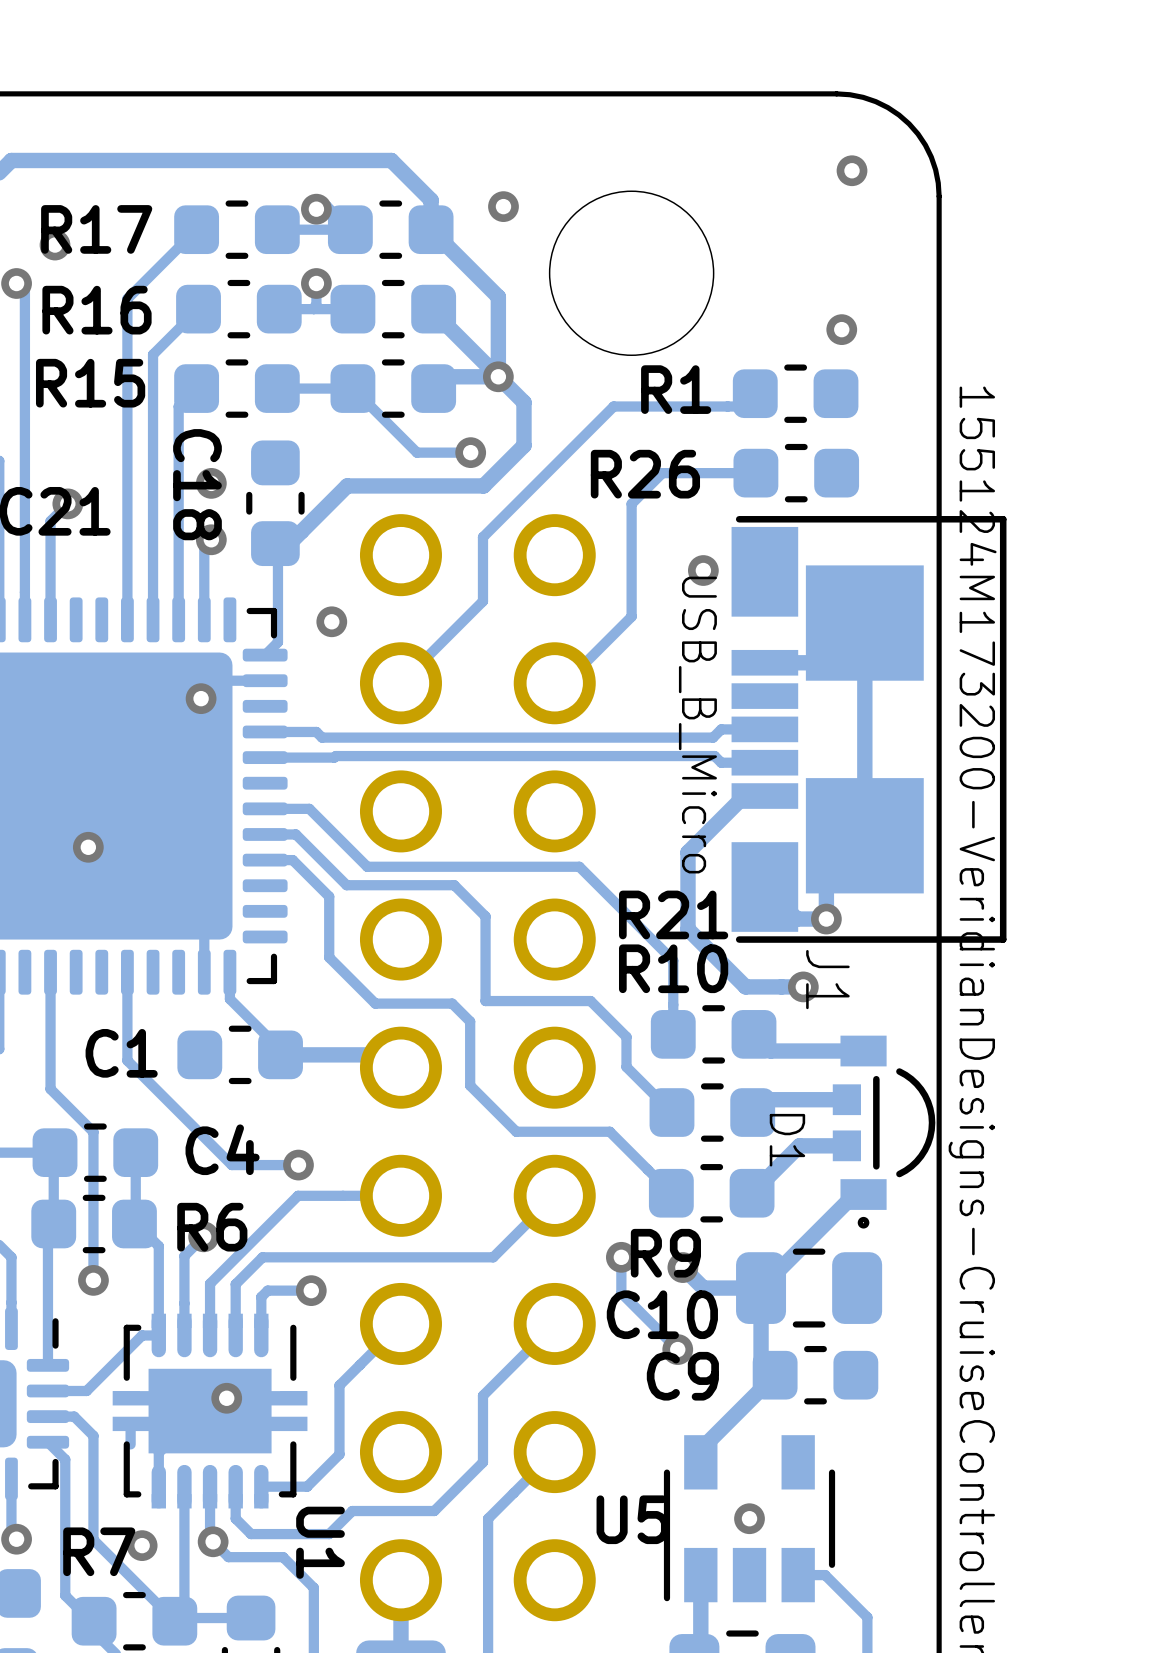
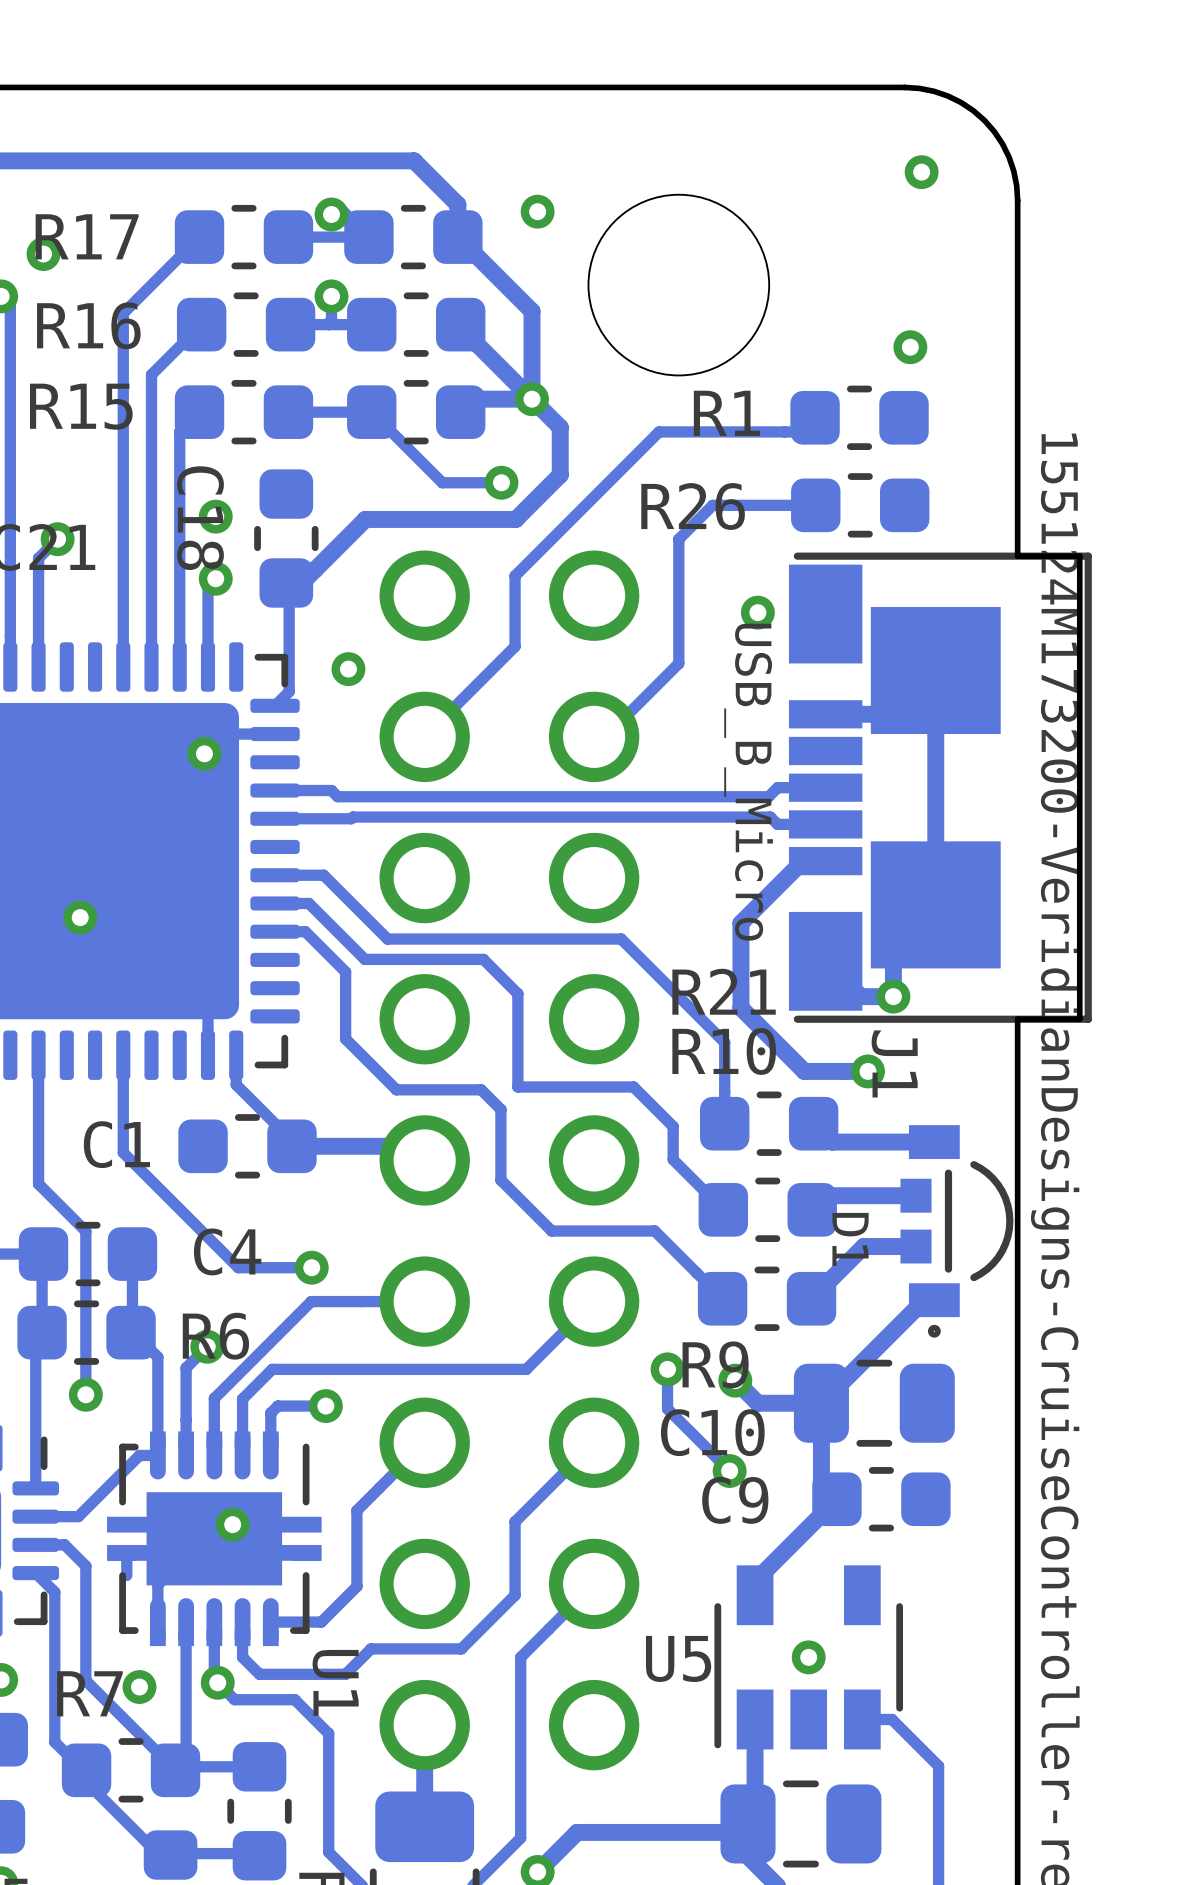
board edge: (939, 519) (939, 939) -> (1017, 556) (1079, 556) (1079, 1019) (1017, 1019)

